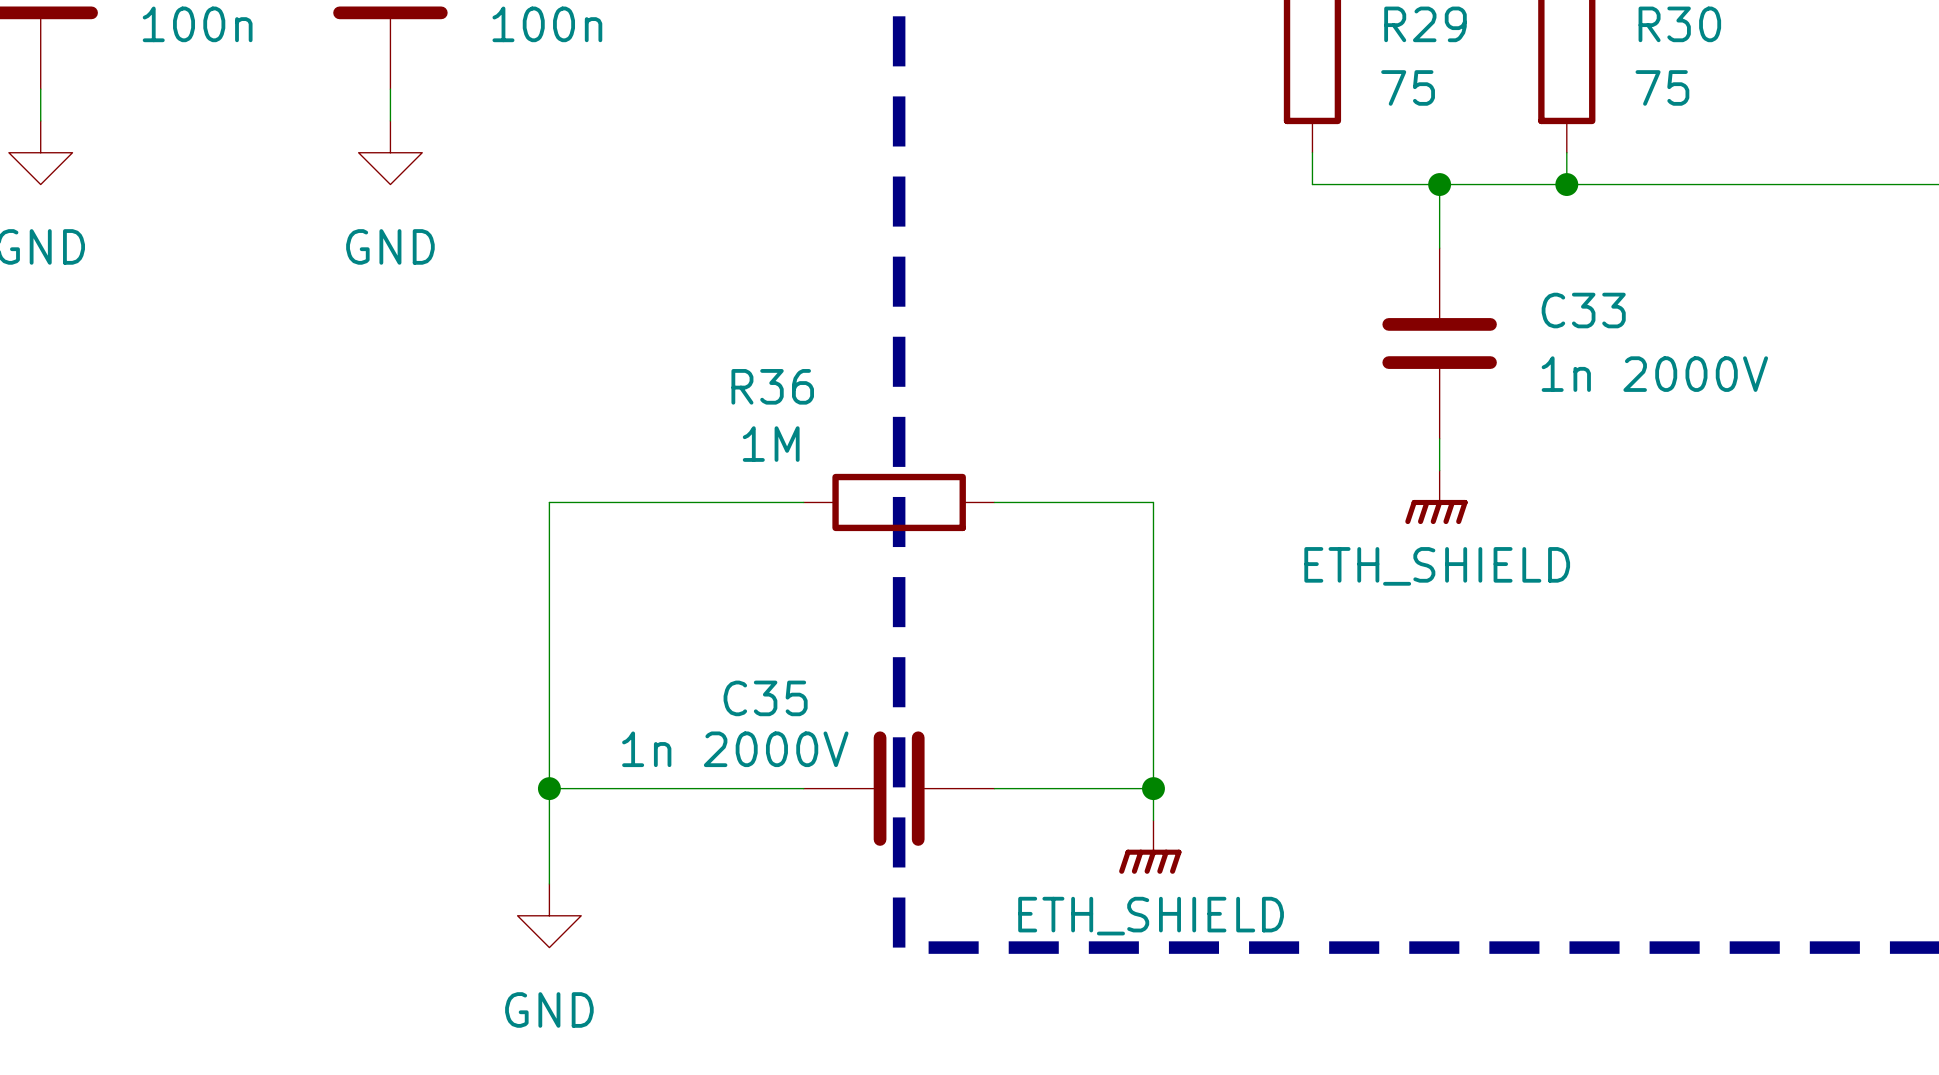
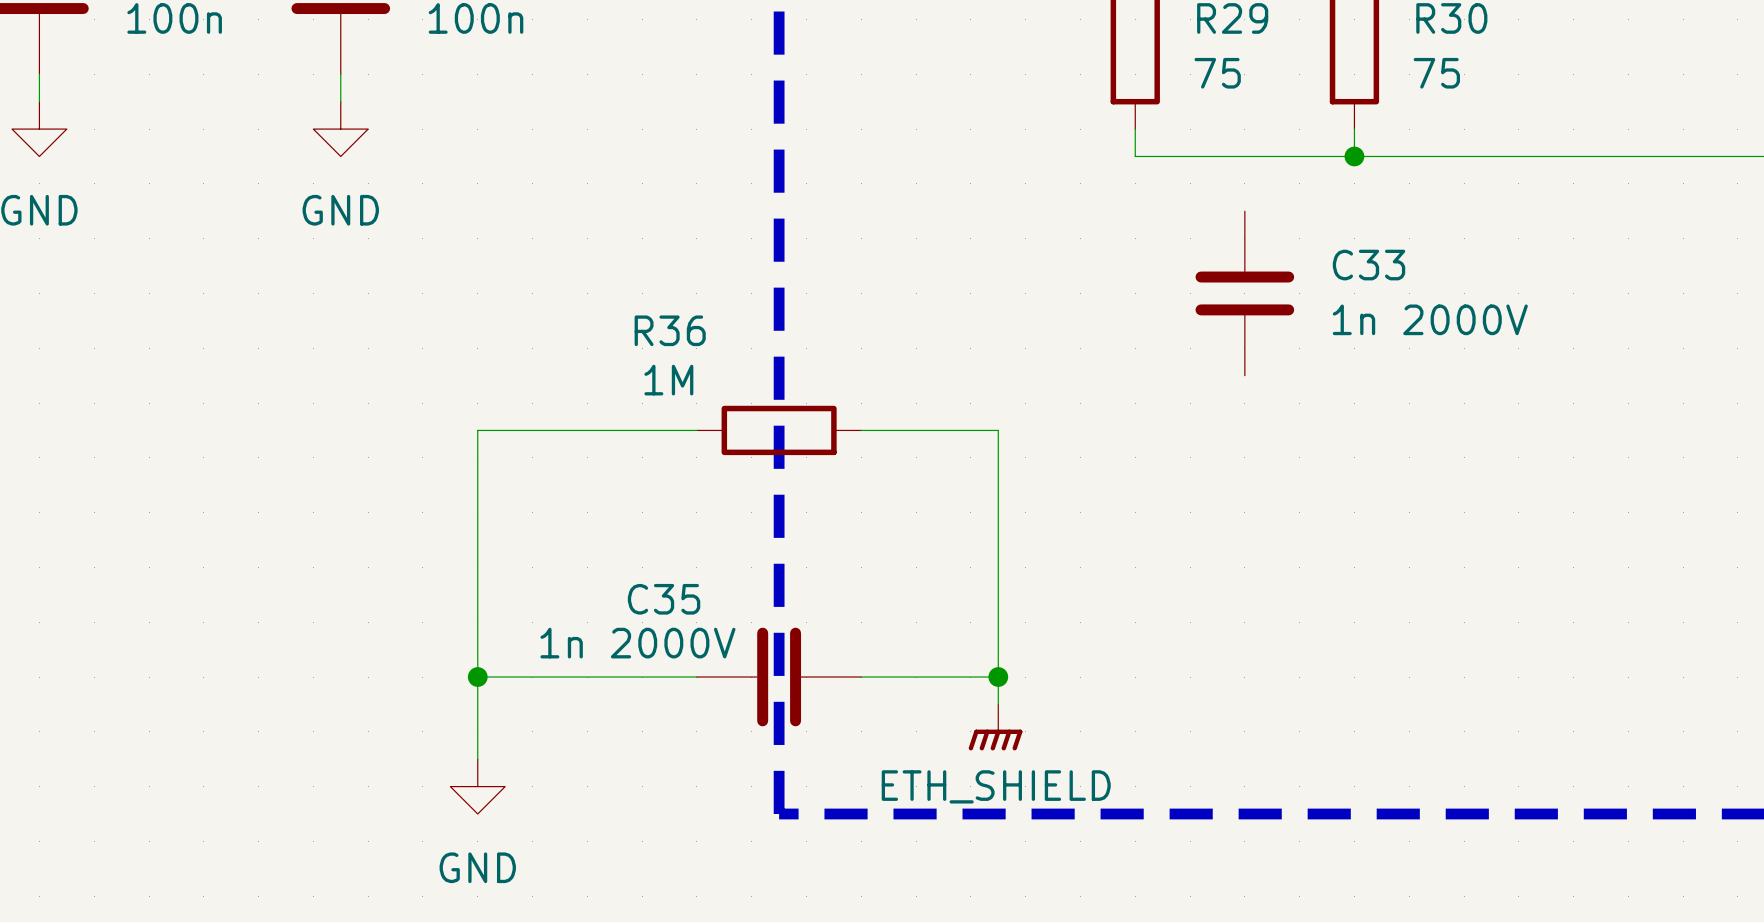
wire: (1439, 184) (1439, 248) -> none
junction: (1439, 184) -> none
wire: (1439, 438) (1439, 470) -> none
power symbol: ETH_SHIELD (1436, 497) -> none

